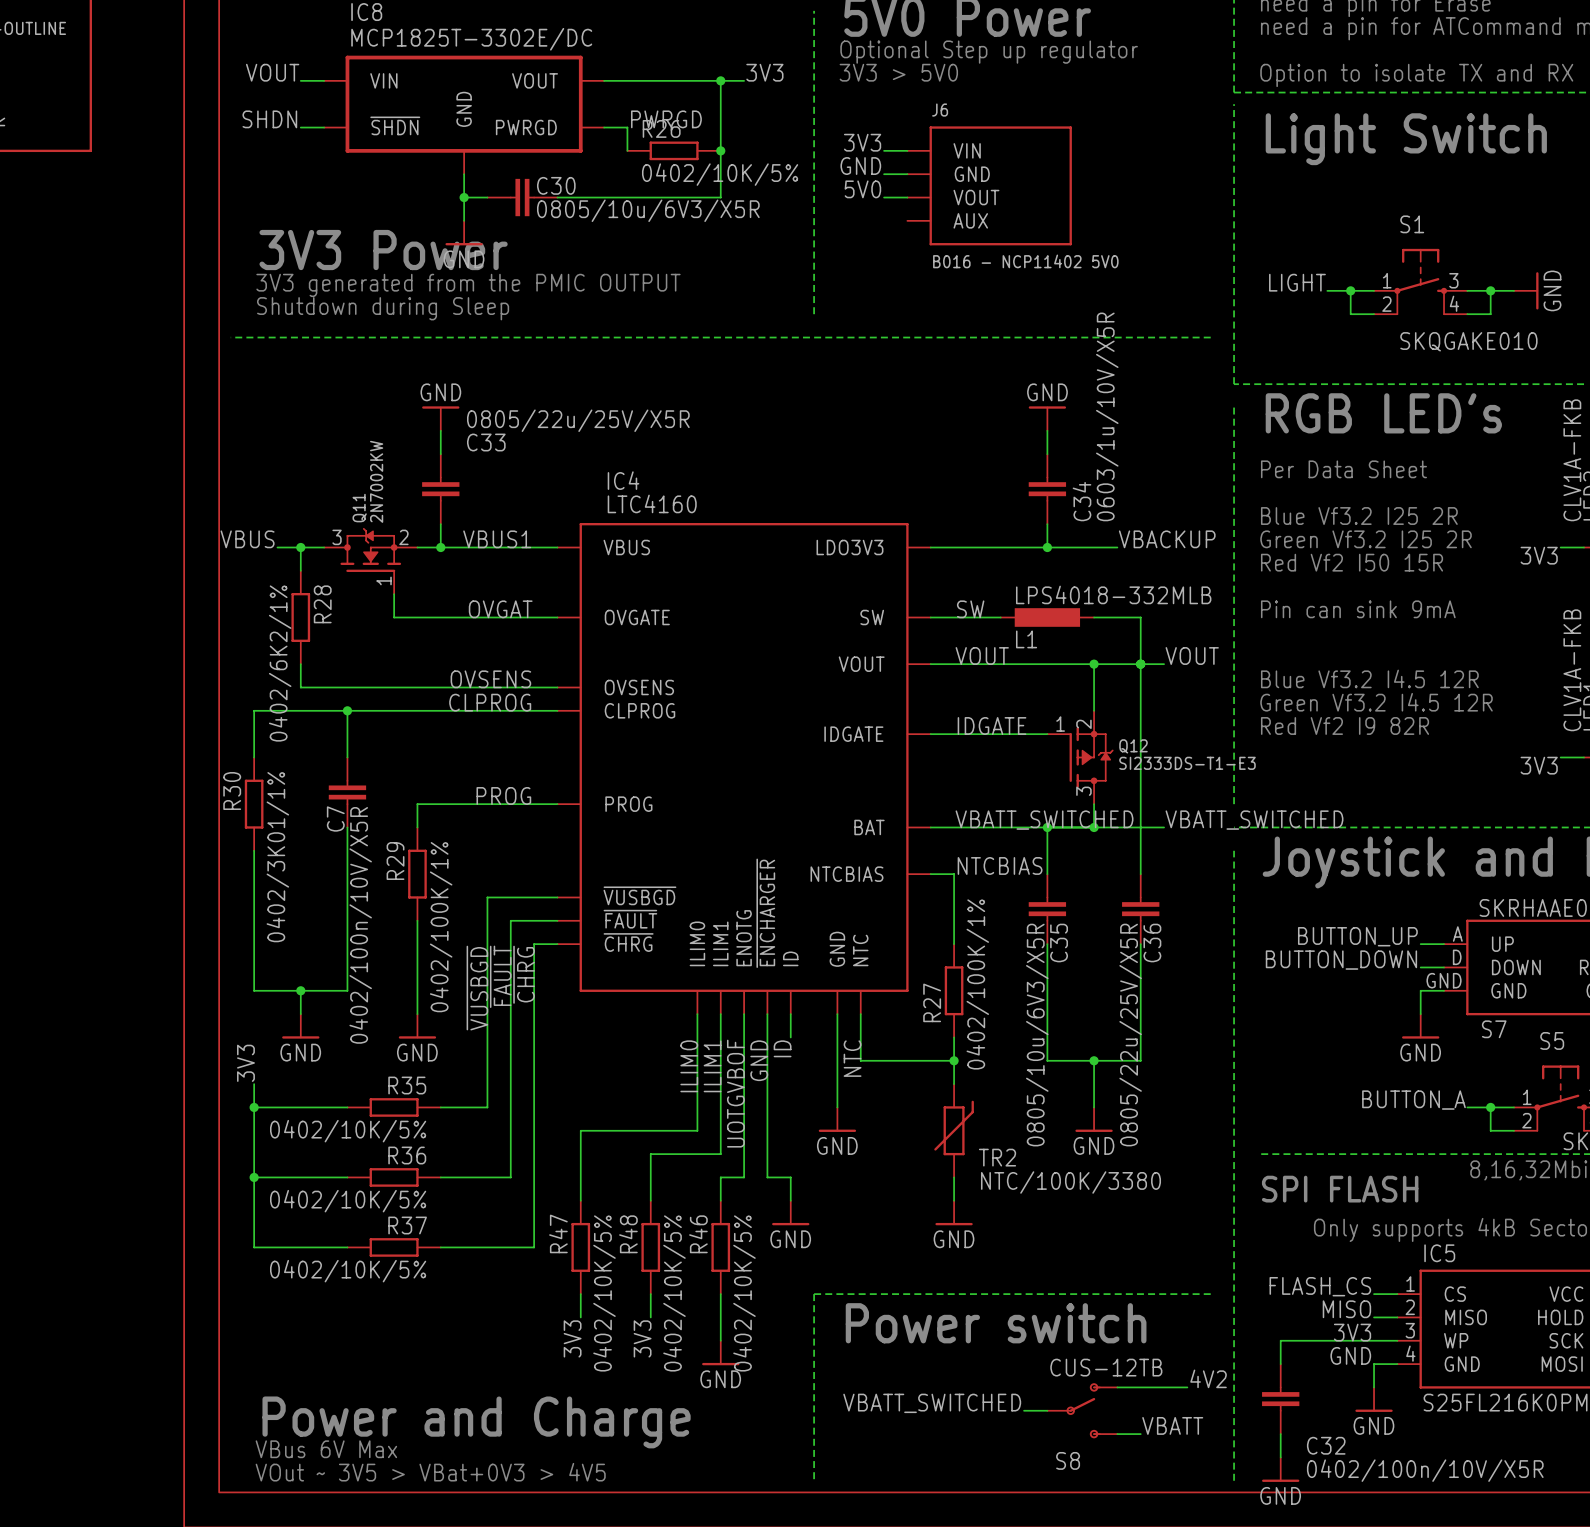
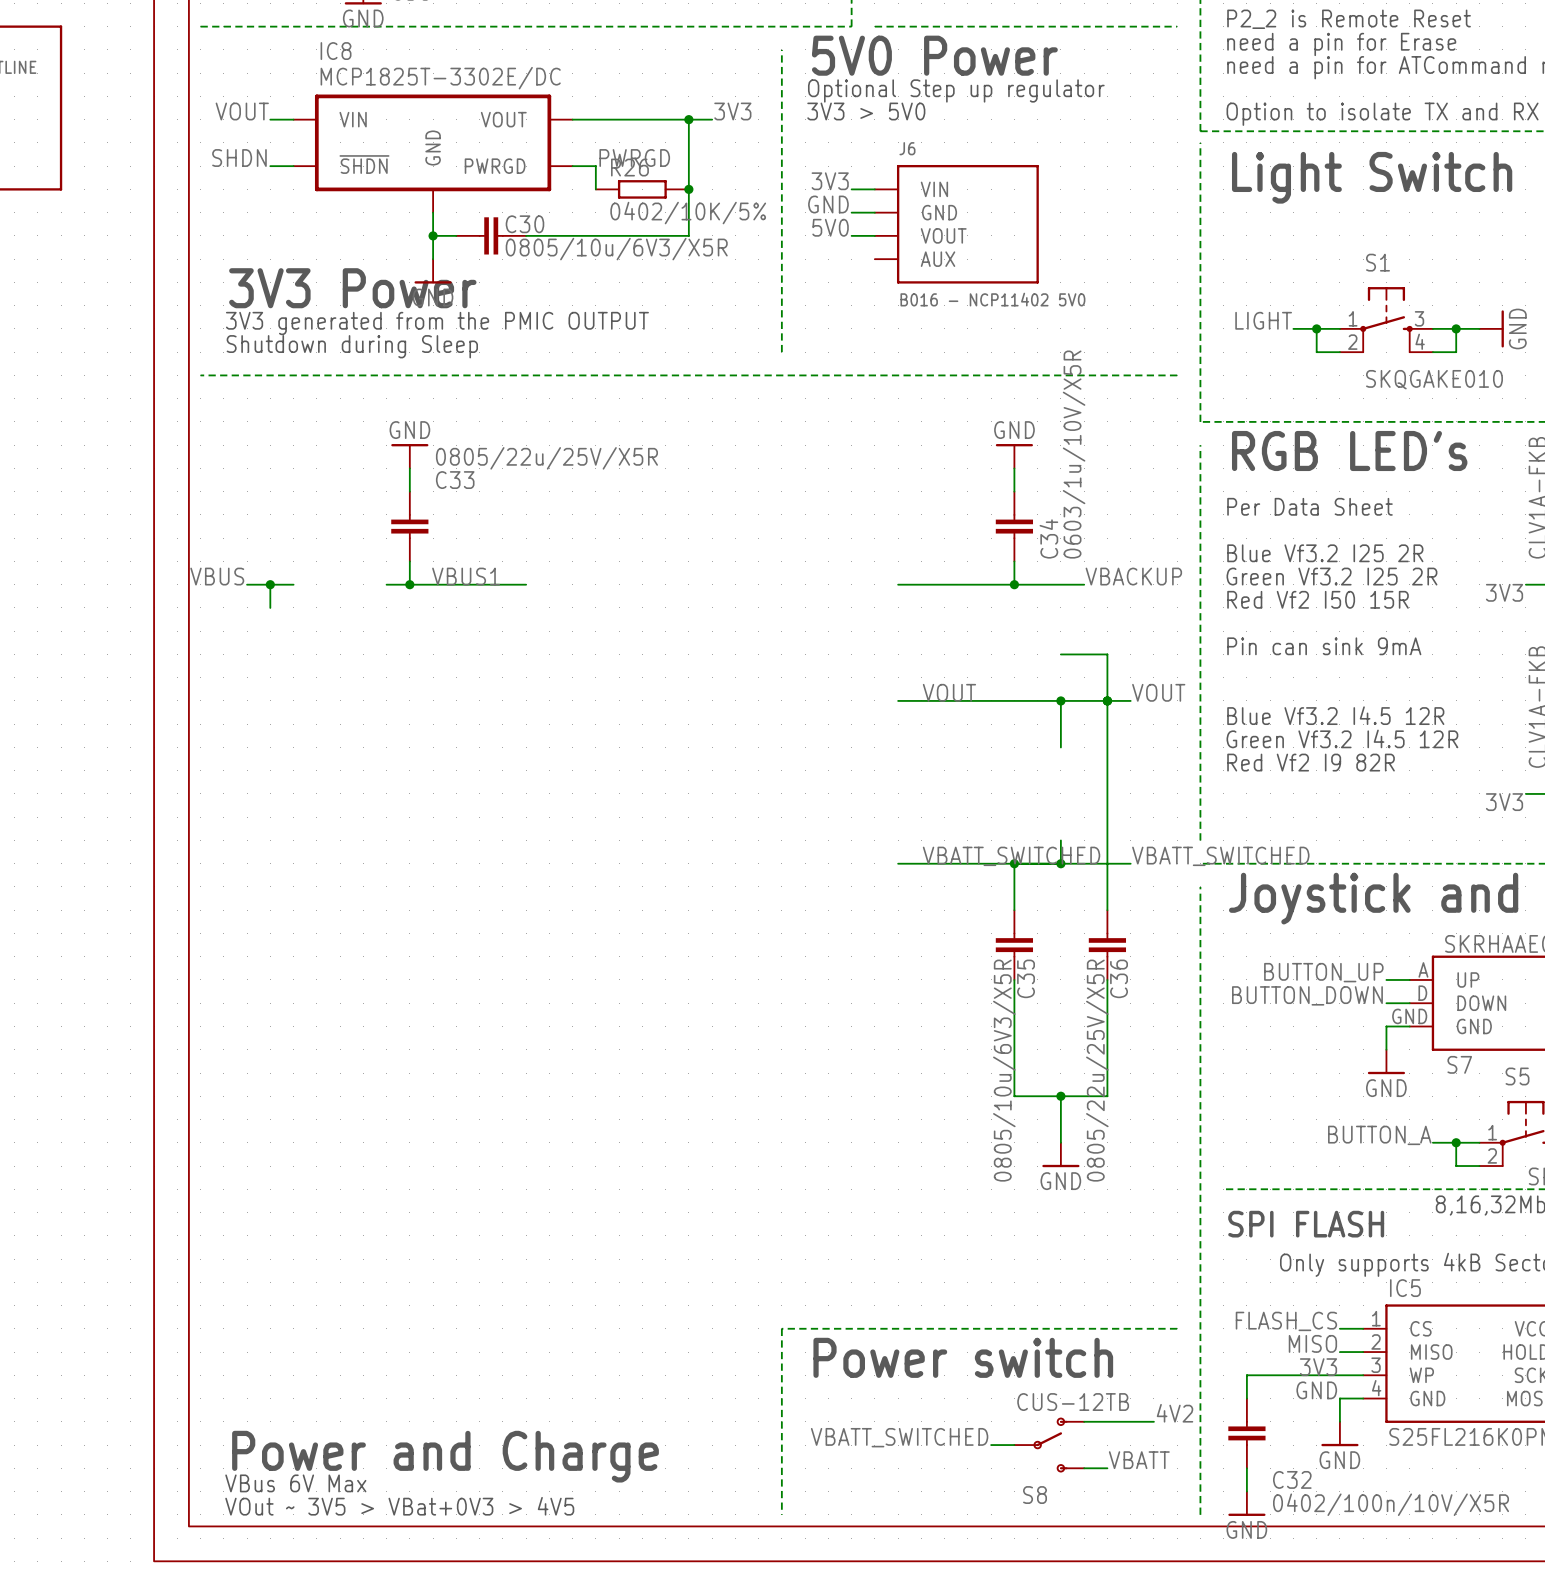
Q11: 2N7002KW (370, 561) -> none
wire: (394, 594) (394, 617) (557, 617) -> none
label: OVGAT (500, 609) -> none
label: SW (970, 609) -> none
R28: 0402/6K2/1% (300, 617) -> none
wire: (930, 617) (1000, 617) -> none
L1: LPS4018-332MLB (1047, 617) -> none
wire: (300, 664) (300, 687) (557, 687) -> none
label: OVSENS (490, 679) -> none
label: CLPROG (490, 702) -> none
wire: (347, 710) (347, 757) -> none
junction: (347, 710) -> none
wire: (557, 710) (254, 710) (254, 757) -> none
label: IDGATE (992, 725) -> none
wire: (930, 734) (1047, 734) -> none
Q12: SI2333DS-T1-E3 (1080, 757) -> none
IC4: LTC4160 (744, 768) -> none
C7: 0402/100n/10V/X5R (347, 792) -> none
label: PROG (503, 795) -> none
R30: 0402/3K01/1% (254, 804) -> none
wire: (557, 804) (417, 804) (417, 827) -> none
wire: (347, 827) (347, 990) (254, 990) (254, 850) -> none
label: NTCBIAS (1000, 865) -> none
R29: 0402/100K/1% (417, 874) -> none
wire: (930, 874) (954, 874) (954, 944) -> none
wire: (557, 897) (487, 897) (487, 1107) (440, 1107) -> none
wire: (417, 920) (417, 1014) -> none
wire: (557, 920) (510, 920) (510, 1177) (440, 1177) -> none
wire: (557, 944) (534, 944) (534, 1247) (440, 1247) -> none
label: ~{CHRG} (524, 974) -> none
label: ~{FAULT} (500, 976) -> none
label: ~{VUSBGD} (477, 988) -> none
wire: (300, 990) (300, 1014) -> none
junction: (300, 990) -> none
R27: 0402/100K/1% (954, 990) -> none
wire: (697, 1014) (697, 1130) (580, 1130) (580, 1200) -> none
wire: (720, 1014) (720, 1154) (650, 1154) (650, 1200) -> none
wire: (744, 1014) (744, 1177) (720, 1177) (720, 1200) -> none
wire: (767, 1014) (767, 1177) (790, 1177) (790, 1200) -> none
wire: (790, 1014) (790, 1037) -> none
wire: (837, 1014) (837, 1107) -> none
wire: (860, 1014) (860, 1060) (954, 1060) -> none
power symbol: GND (300, 1026) -> none
power symbol: GND (417, 1026) -> none
wire: (954, 1037) (954, 1084) -> none
label: ID (782, 1048) -> none
label: NTC (852, 1058) -> none
label: GND (759, 1060) -> none
junction: (954, 1060) -> none
label: 3V3 (245, 1063) -> none
label: ILIM0 (689, 1066) -> none
label: ILIM1 (712, 1066) -> none
wire: (254, 1084) (254, 1247) (347, 1247) -> none
label: UOTGVBOF (735, 1093) -> none
wire: (254, 1107) (347, 1107) -> none
junction: (254, 1107) -> none
R35: 0402/10K/5% (394, 1107) -> none
power symbol: GND (837, 1119) -> none
TR2: NTC/100K/3380 (954, 1130) -> none
wire: (254, 1177) (347, 1177) -> none
junction: (254, 1177) -> none
R36: 0402/10K/5% (394, 1177) -> none
wire: (954, 1177) (954, 1200) -> none
power symbol: GND (790, 1213) -> none
power symbol: GND (954, 1213) -> none
R37: 0402/10K/5% (394, 1247) -> none
R47: 0402/10K/5% (580, 1247) -> none
R48: 0402/10K/5% (650, 1247) -> none
R46: 0402/10K/5% (720, 1247) -> none
wire: (580, 1294) (580, 1317) -> none
wire: (650, 1294) (650, 1317) -> none
wire: (720, 1294) (720, 1340) -> none
label: 3V3 (572, 1338) -> none
label: 3V3 (642, 1338) -> none
power symbol: GND (720, 1353) -> none

